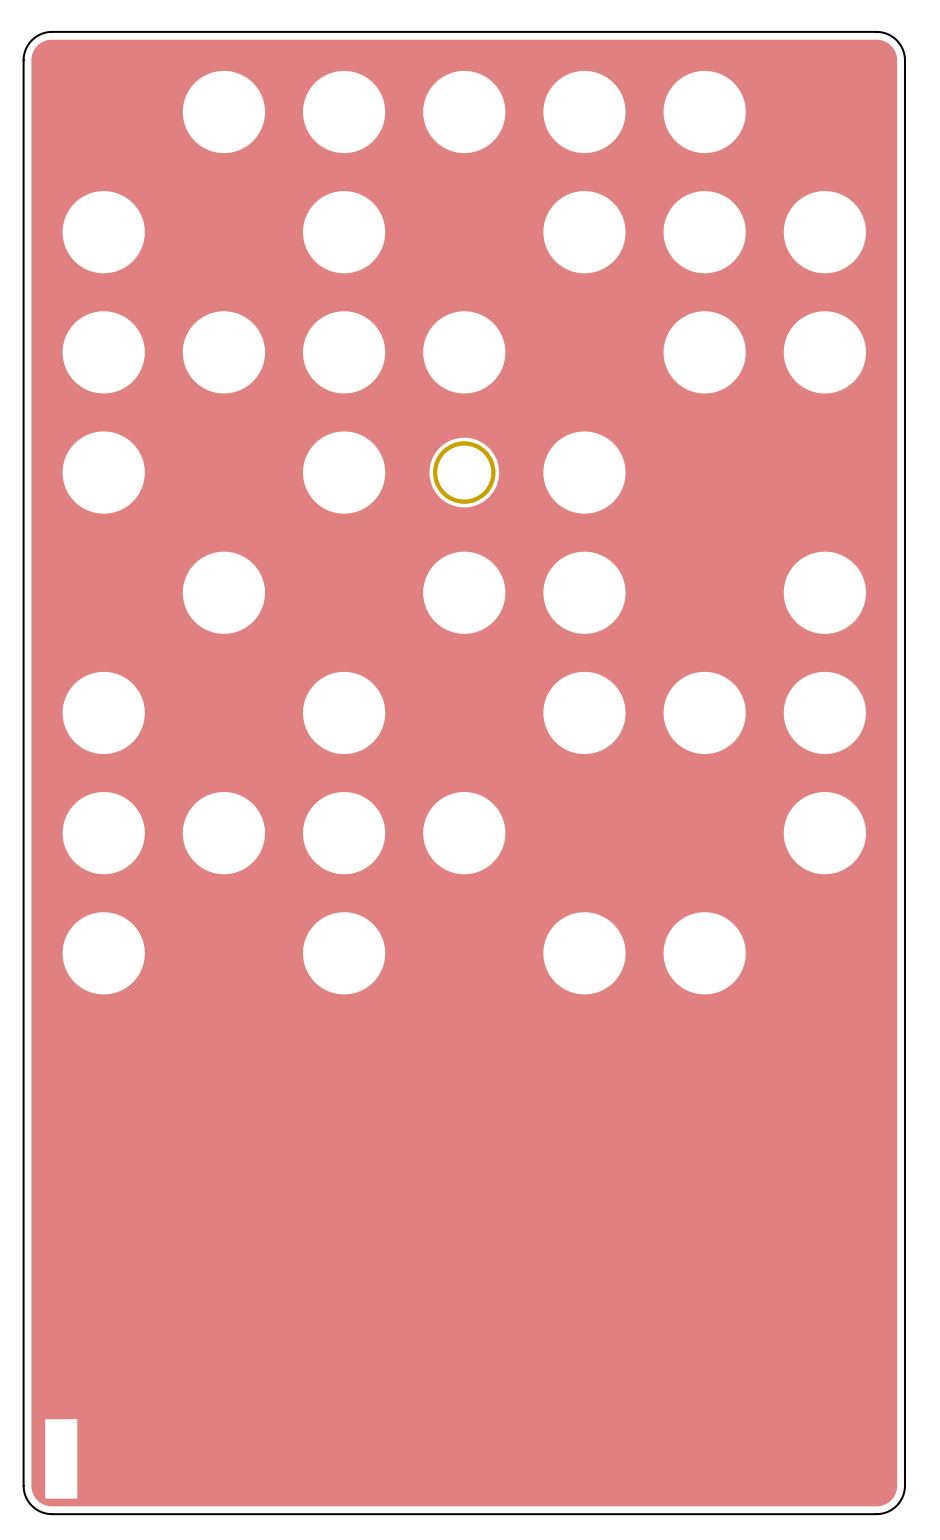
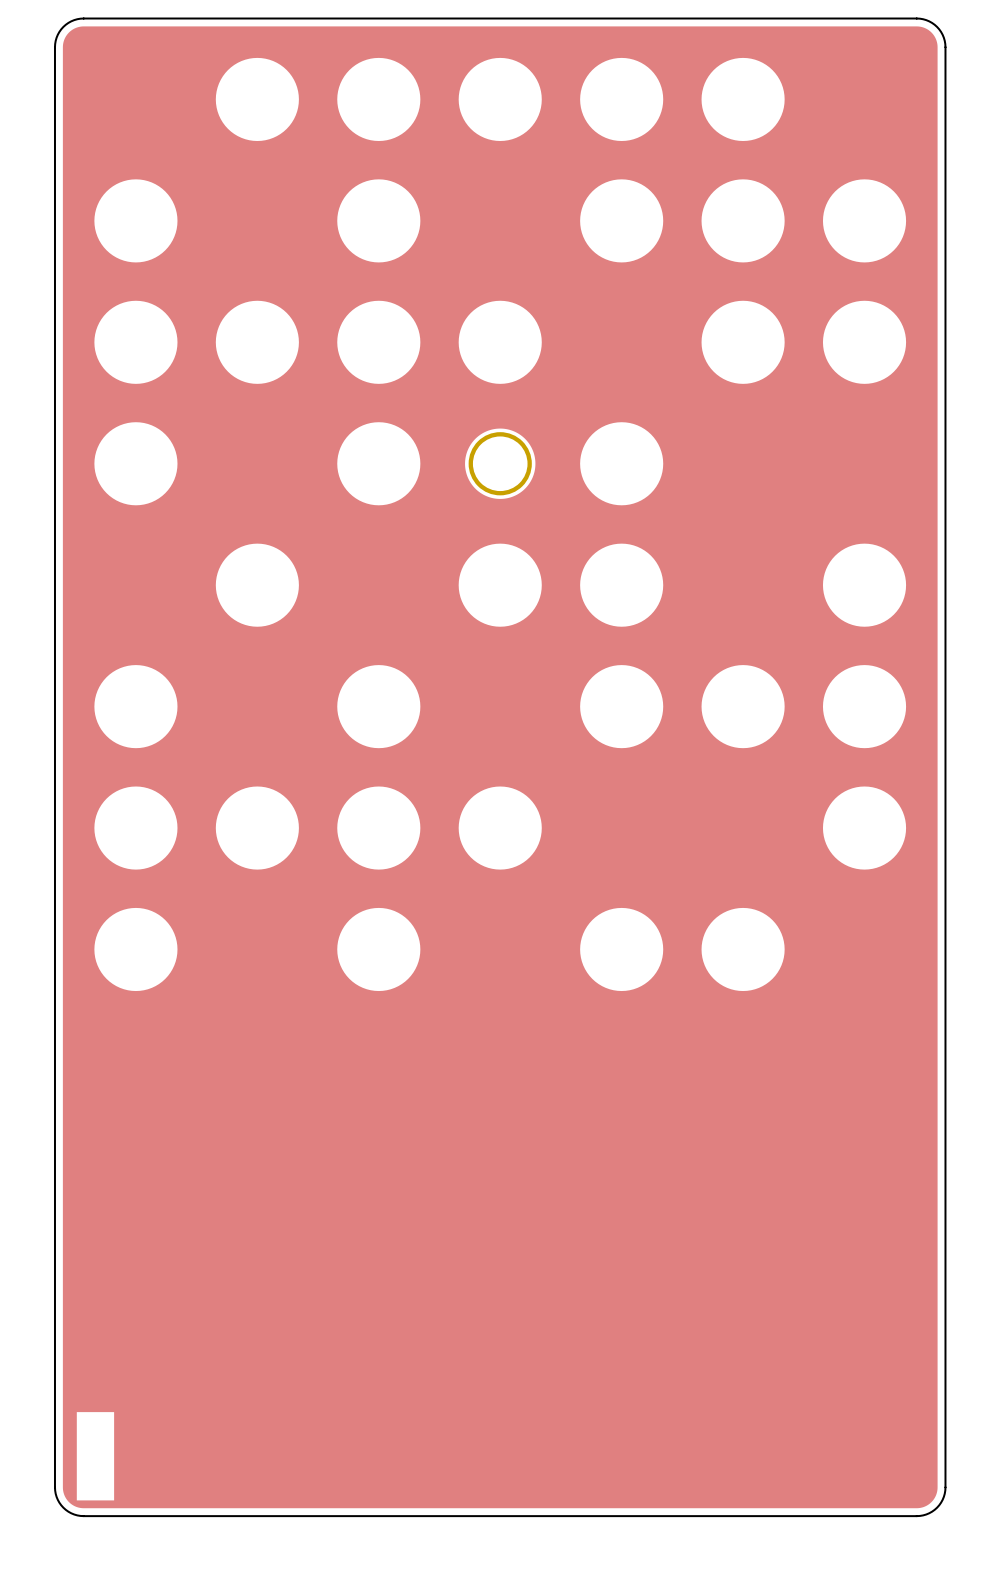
drawing shape: [31, 39, 898, 1507] -> [62, 26, 938, 1509]

